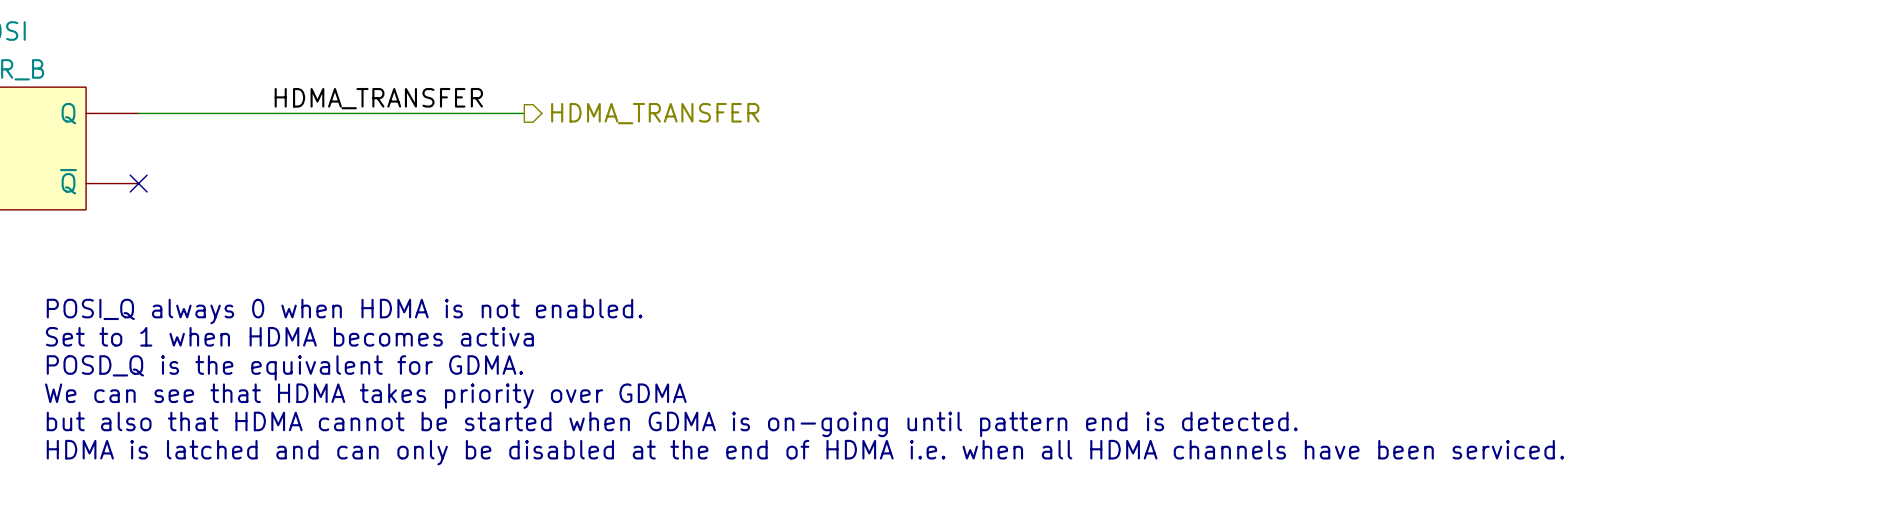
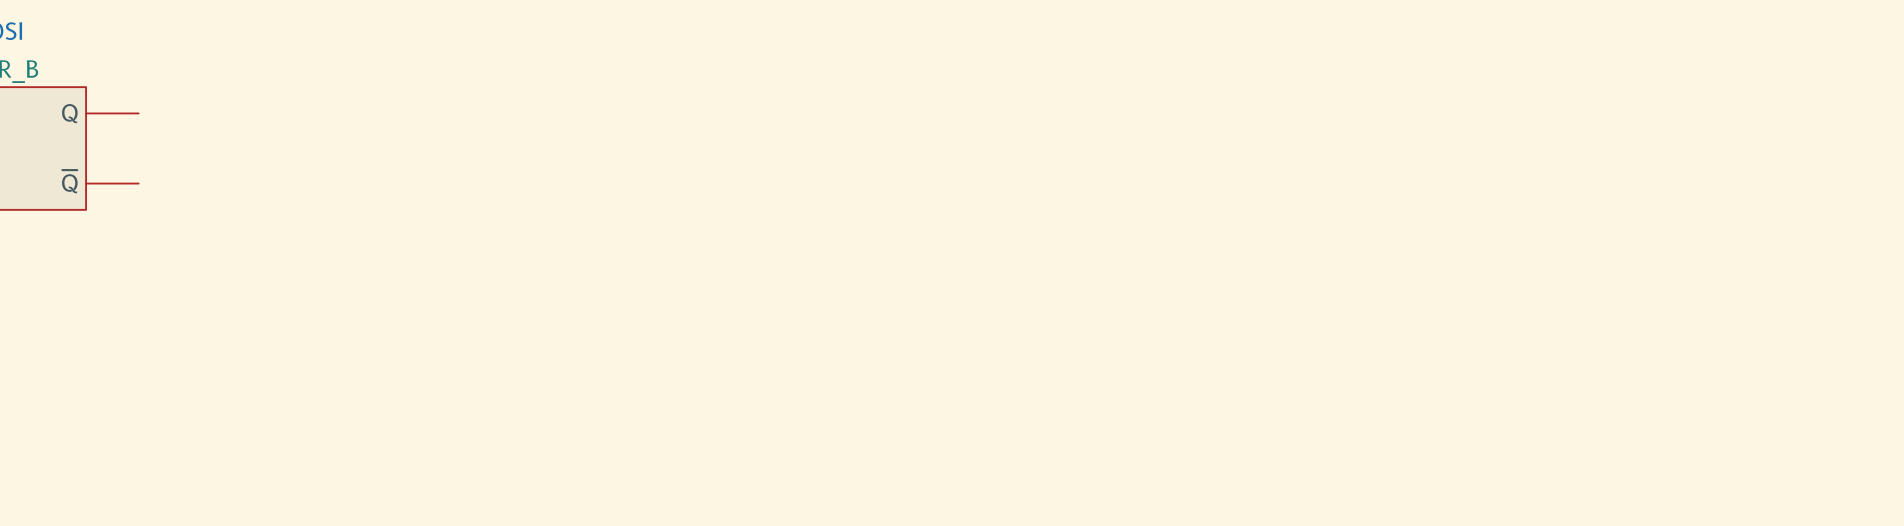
label: HDMA_TRANSFER (378, 98) -> none
wire: (138, 113) (524, 113) -> none
hierarchical label: HDMA_TRANSFER (655, 113) -> none
no-connect mark: (138, 183) -> none
text: POSI_Q always 0 when HDMA is not enabled. (344, 311) -> none
text: Set to 1 when HDMA becomes activa (289, 336) -> none
text: POSD_Q is the equivalent for GDMA. (284, 367) -> none
text: We can see that HDMA takes priority over GDMA (365, 396) -> none
text: but also that HDMA cannot be started when GDMA is on-going until pattern end is detected. (672, 424) -> none
text: HDMA is latched and can only be disabled at the end of HDMA i.e. when all HDMA channels have been serviced. (805, 452) -> none

